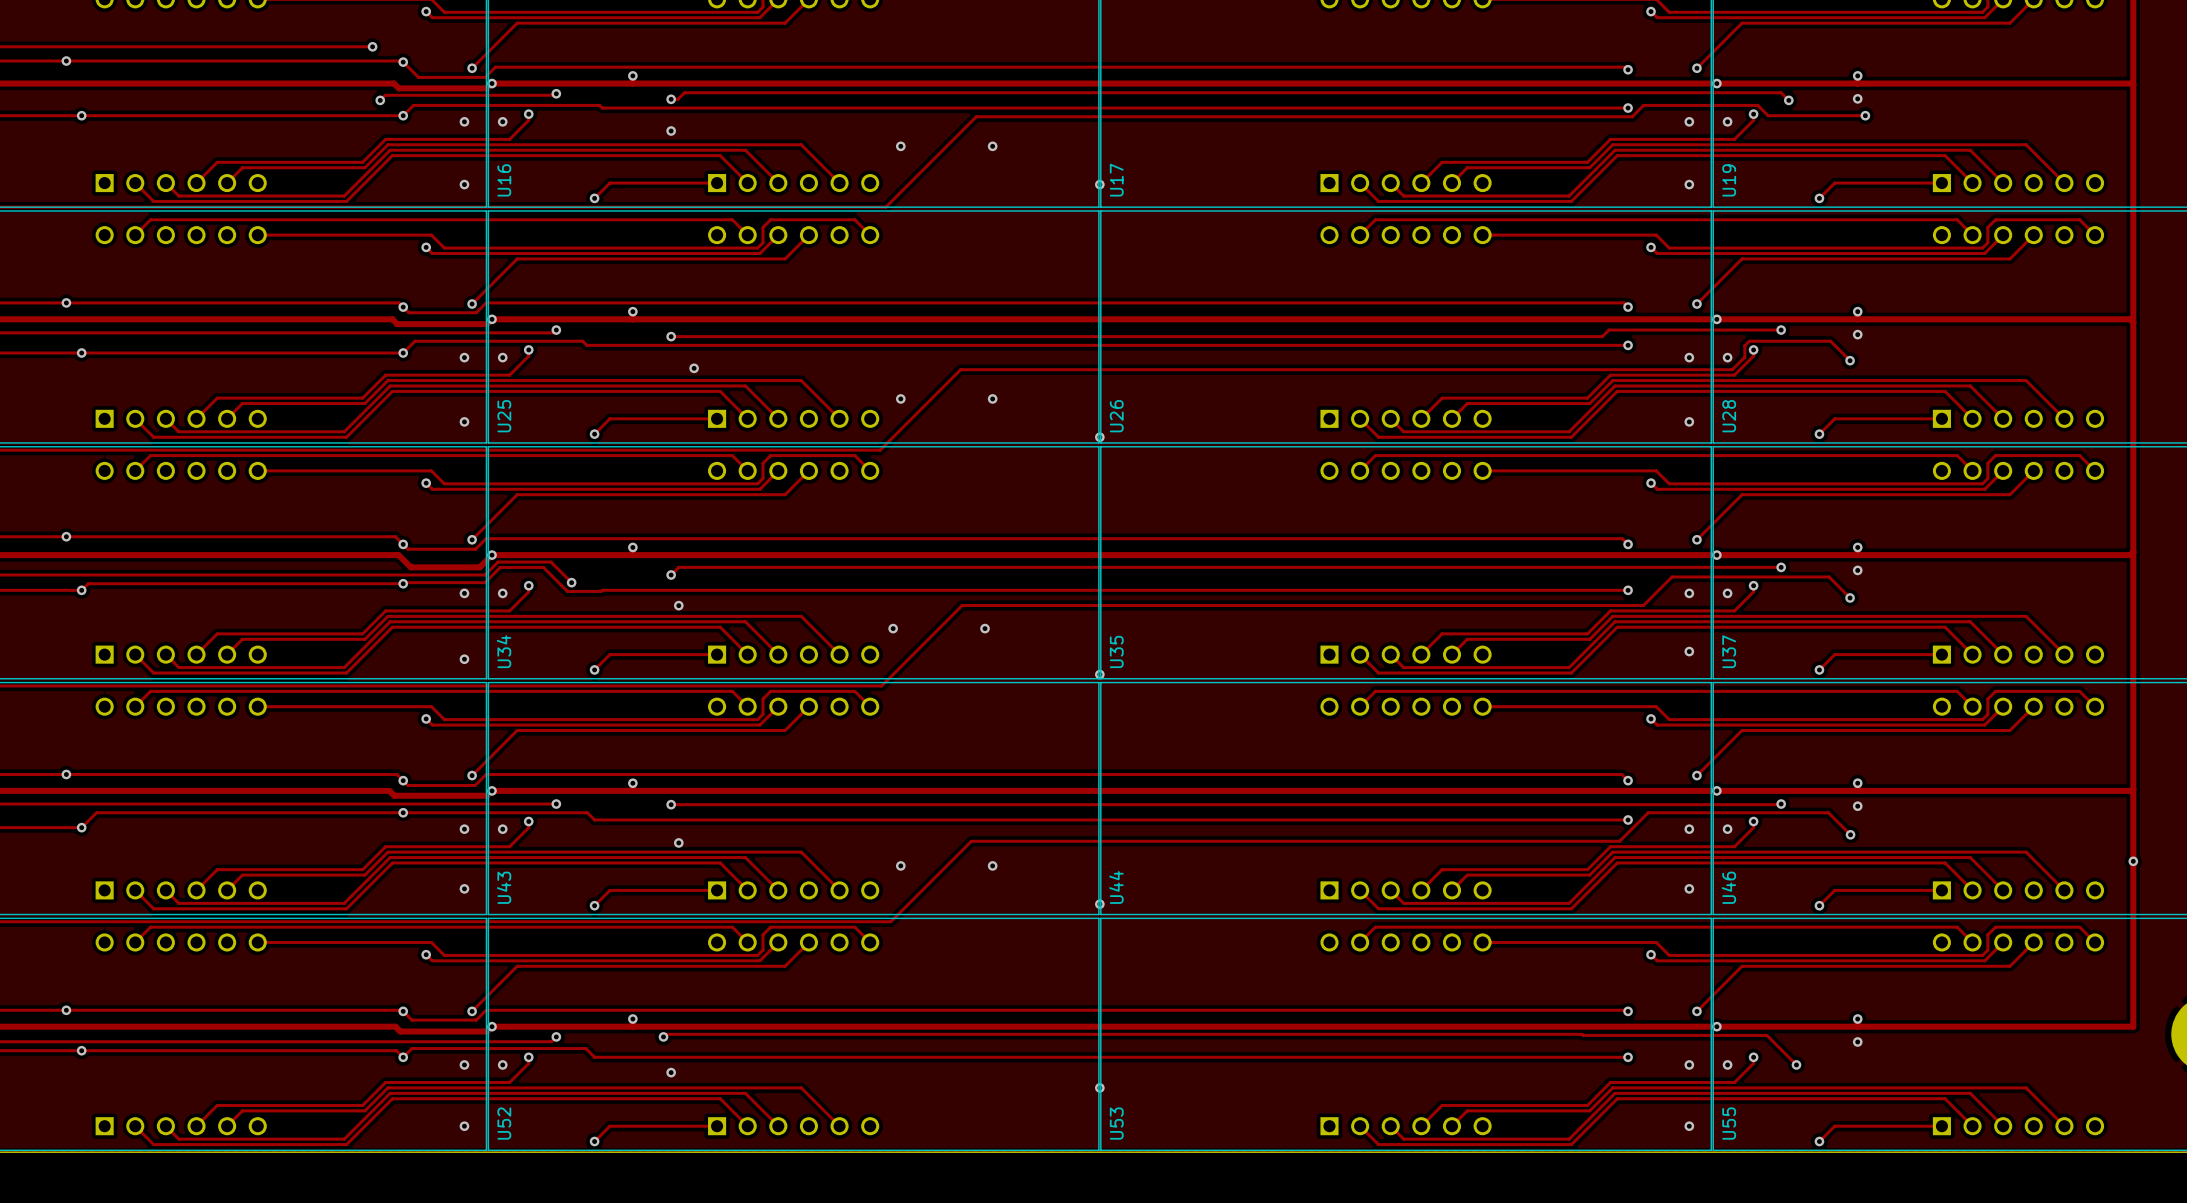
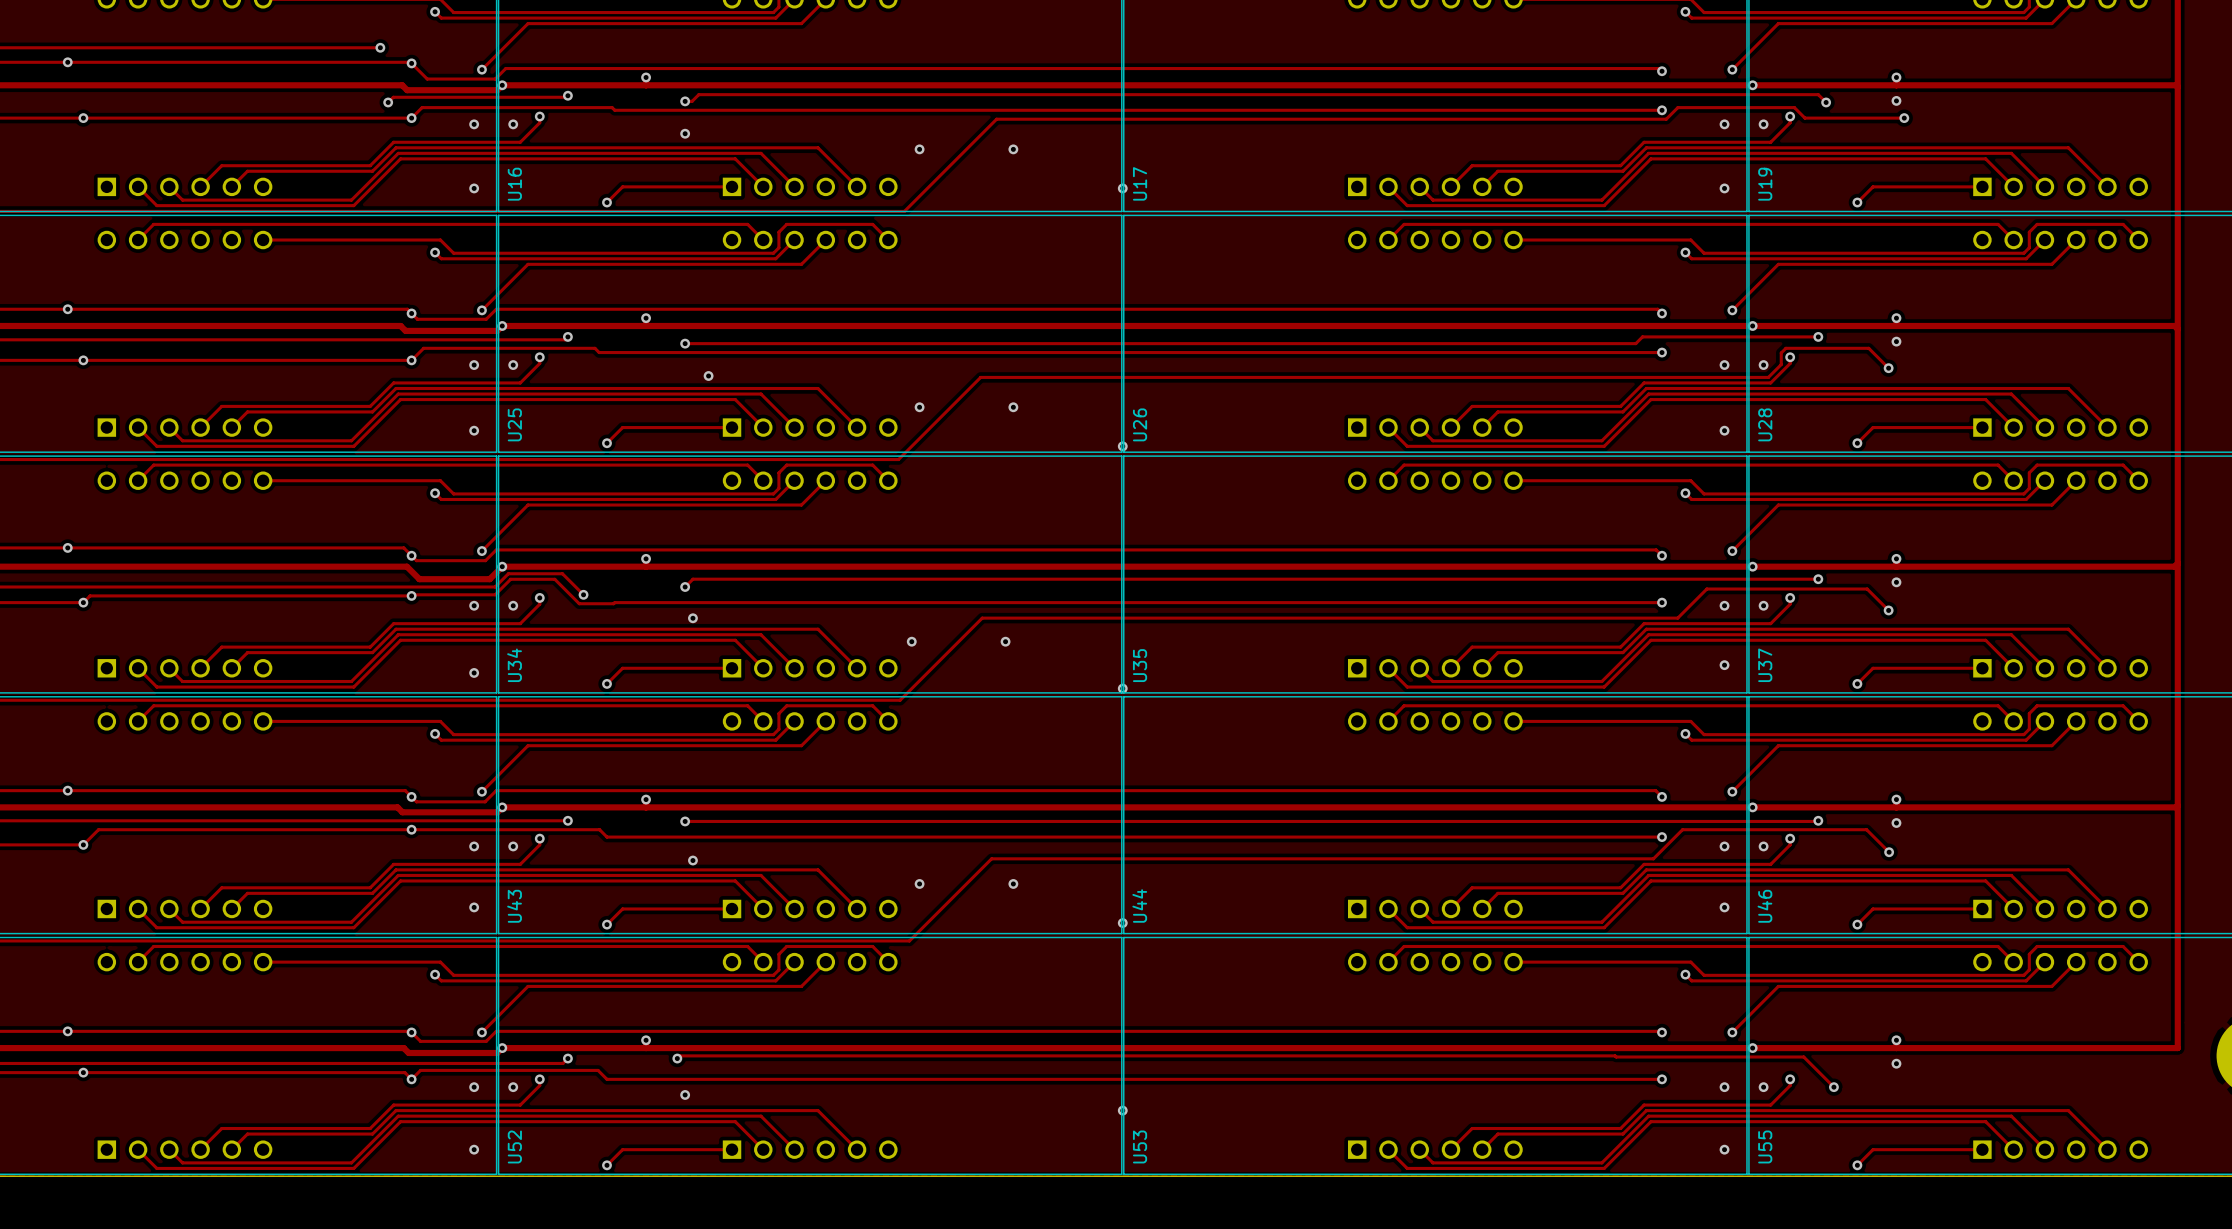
via: (2133, 861) -> none

